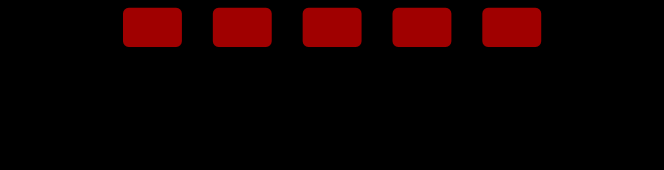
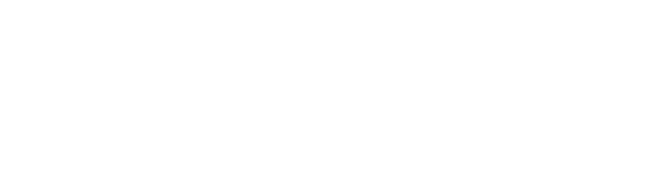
part: (152, 27) -> none
part: (242, 27) -> none
part: (332, 27) -> none
part: (421, 27) -> none
part: (511, 27) -> none

